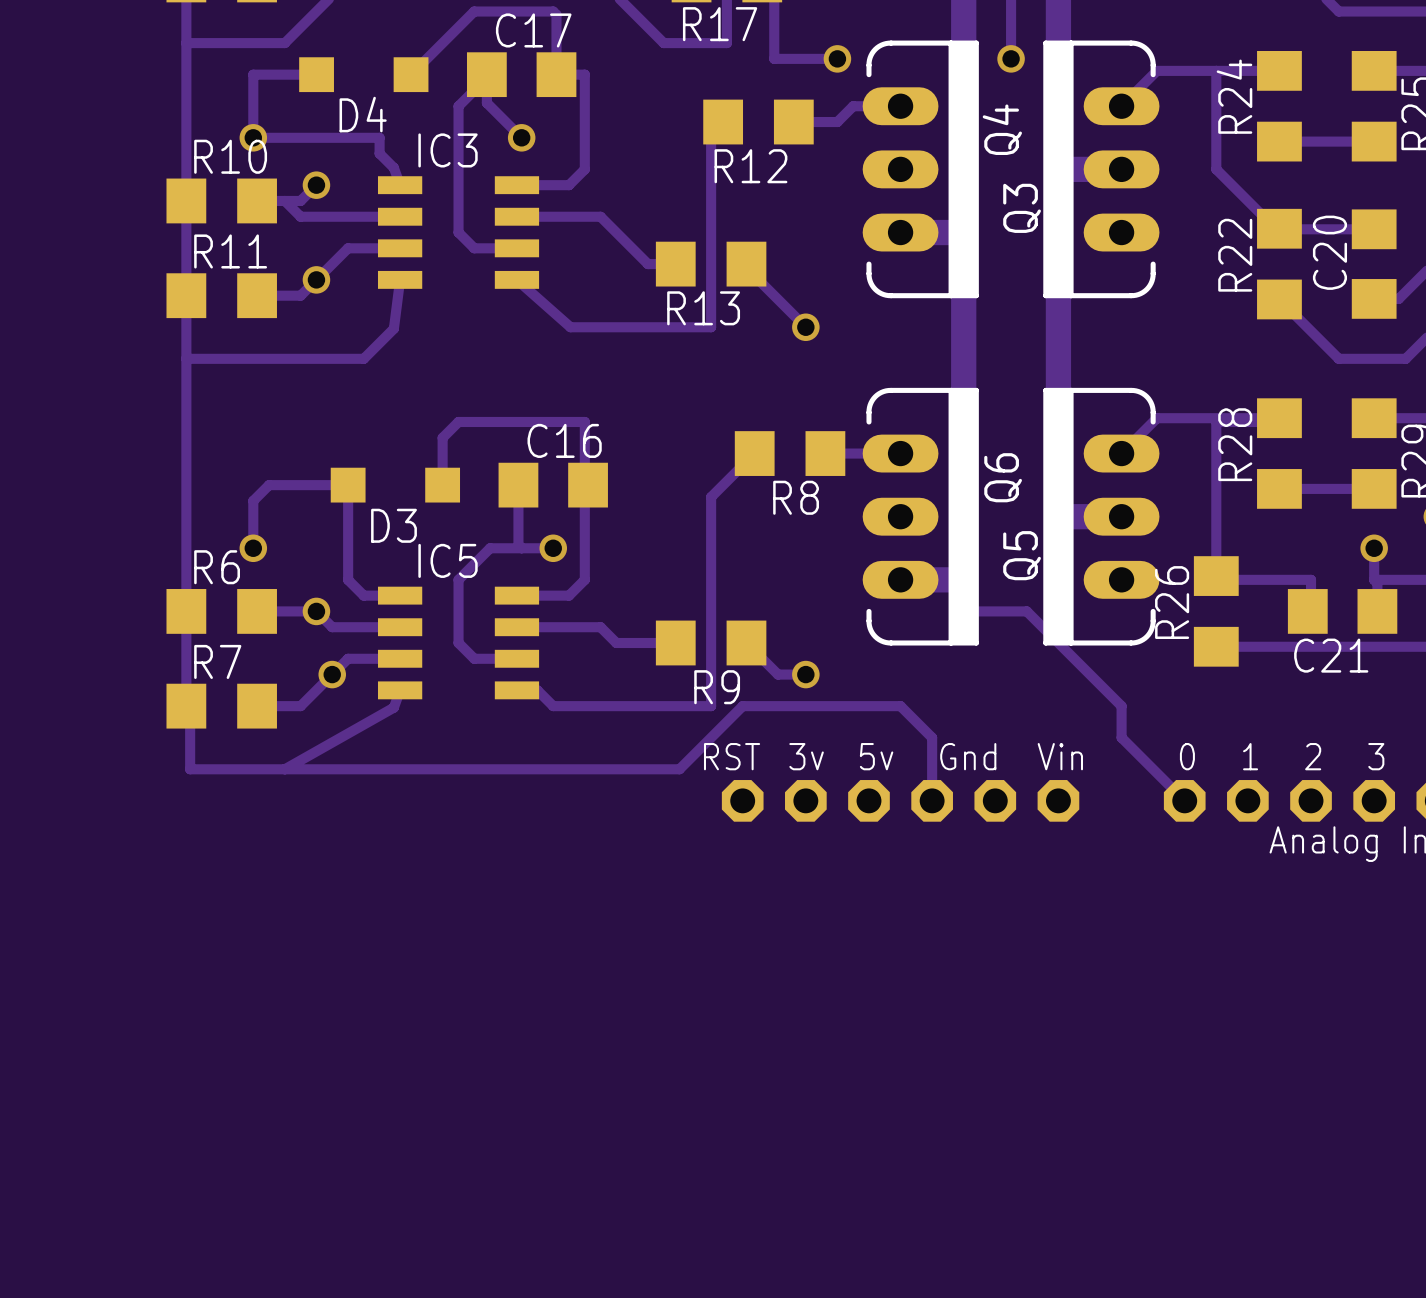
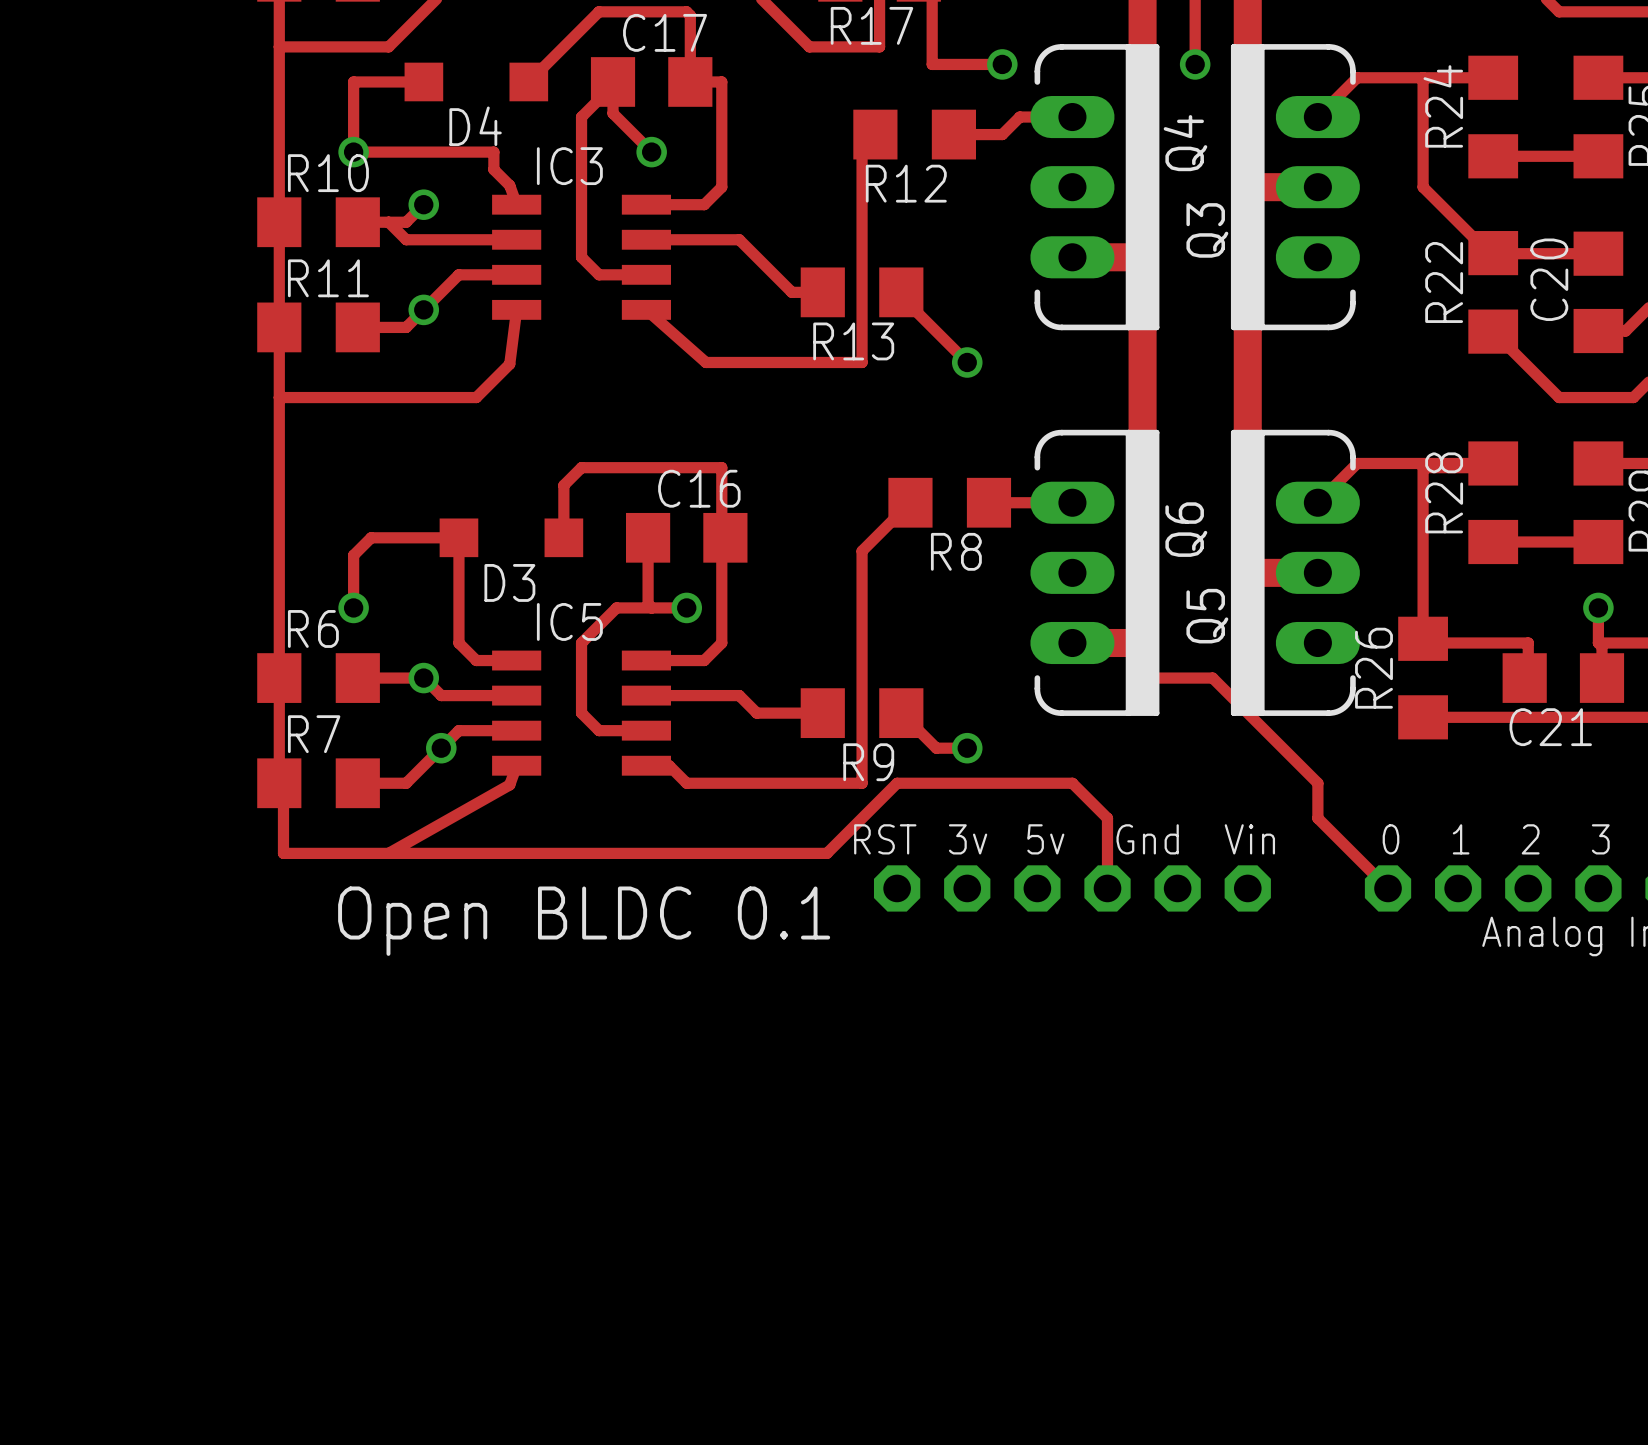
text: none -> Open BLDC 0.1 (584, 921)

